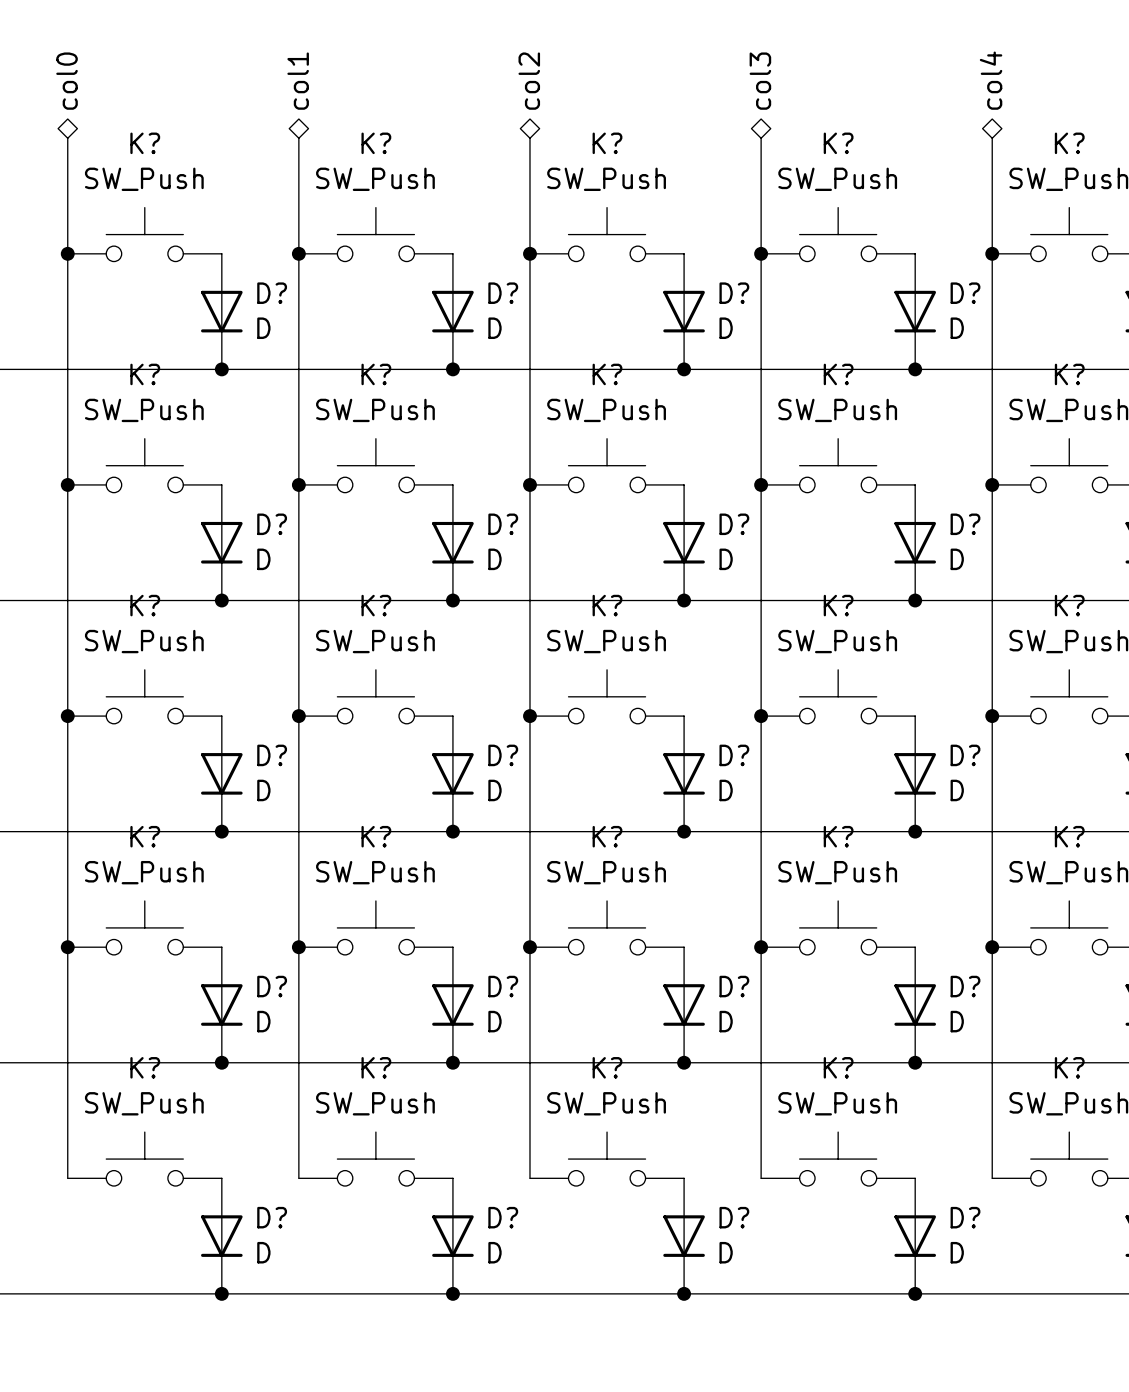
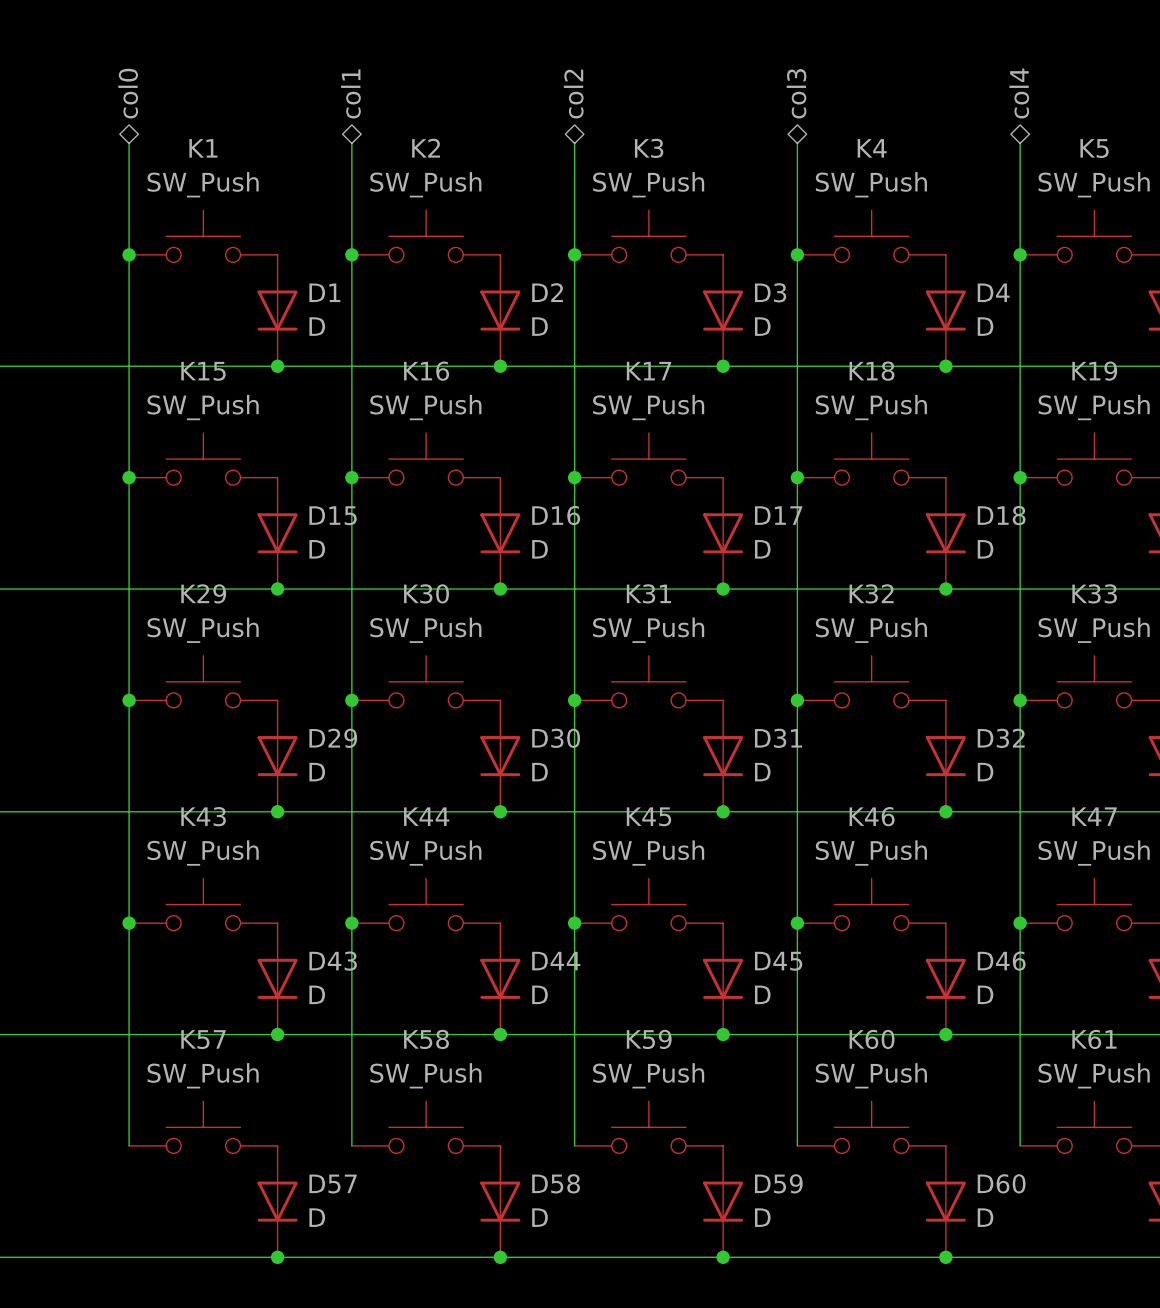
K? name: K? (145, 143) -> K1 (203, 148)
K? name: K? (376, 143) -> K2 (426, 148)
K? name: K? (607, 143) -> K3 (649, 148)
K? name: K? (838, 143) -> K4 (872, 148)
K? name: K? (1069, 143) -> K5 (1094, 148)
D? name: D? (272, 293) -> D1 (324, 292)
D? name: D? (503, 293) -> D2 (547, 292)
D? name: D? (734, 293) -> D3 (770, 292)
D? name: D? (965, 293) -> D4 (993, 292)
K? name: K? (145, 374) -> K15 (203, 371)
K? name: K? (376, 374) -> K16 (426, 371)
K? name: K? (607, 374) -> K17 (649, 371)
K? name: K? (838, 374) -> K18 (872, 371)
K? name: K? (1069, 374) -> K19 (1094, 371)
D? name: D? (272, 524) -> D15 (333, 515)
D? name: D? (503, 524) -> D16 (556, 515)
D? name: D? (734, 524) -> D17 (778, 515)
D? name: D? (965, 524) -> D18 (1001, 515)
K? name: K? (145, 605) -> K29 (203, 593)
K? name: K? (376, 605) -> K30 (426, 593)
K? name: K? (607, 605) -> K31 (648, 593)
K? name: K? (838, 605) -> K32 (871, 593)
K? name: K? (1069, 605) -> K33 (1094, 593)
D? name: D? (272, 755) -> D29 (333, 738)
D? name: D? (503, 755) -> D30 (556, 738)
D? name: D? (734, 755) -> D31 (778, 738)
D? name: D? (965, 755) -> D32 (1001, 738)
K? name: K? (145, 836) -> K43 (203, 816)
K? name: K? (376, 836) -> K44 (426, 816)
K? name: K? (607, 836) -> K45 (649, 816)
K? name: K? (838, 836) -> K46 (872, 816)
K? name: K? (1069, 836) -> K47 (1094, 816)
D? name: D? (272, 986) -> D43 (333, 961)
D? name: D? (503, 986) -> D44 (556, 961)
D? name: D? (734, 986) -> D45 (778, 961)
D? name: D? (965, 986) -> D46 (1001, 961)
K? name: K? (145, 1067) -> K57 (203, 1039)
K? name: K? (376, 1067) -> K58 (426, 1039)
K? name: K? (607, 1067) -> K59 (649, 1039)
K? name: K? (838, 1067) -> K60 (872, 1039)
K? name: K? (1069, 1067) -> K61 (1094, 1039)
D? name: D? (272, 1217) -> D57 (333, 1184)
D? name: D? (503, 1217) -> D58 (556, 1183)
D? name: D? (734, 1217) -> D59 (778, 1183)
D? name: D? (965, 1217) -> D60 (1001, 1183)

